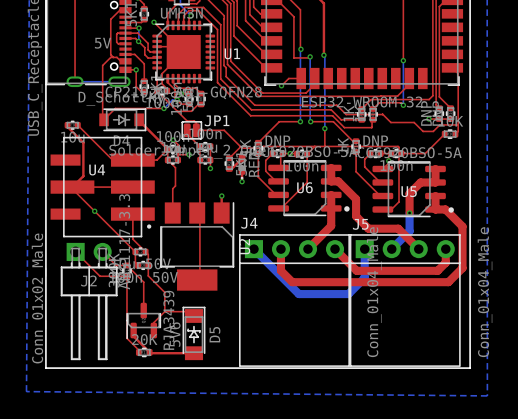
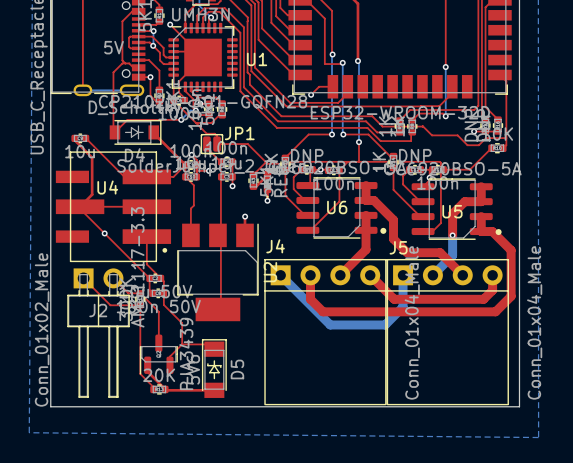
part value: ESP32-WROOM-32 (362, 102) -> ESP32-WROOM-32D (400, 112)

